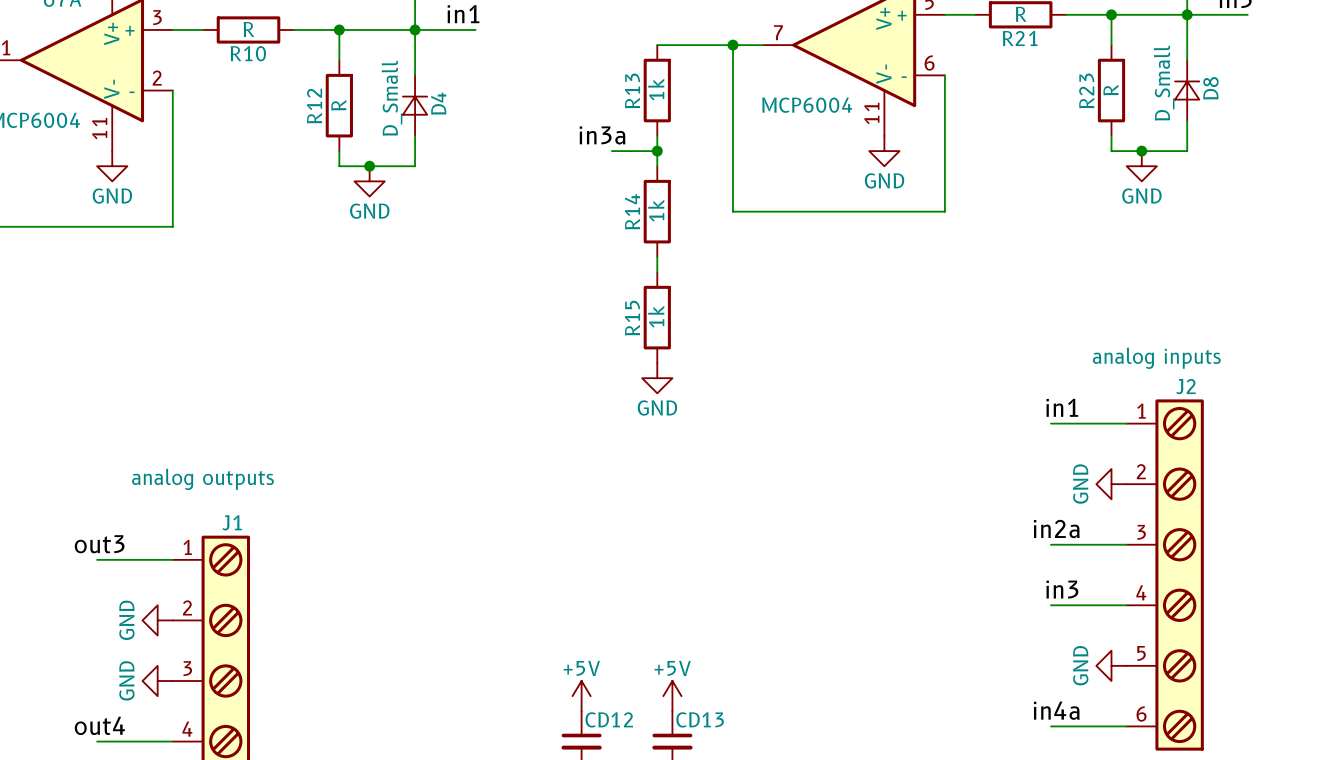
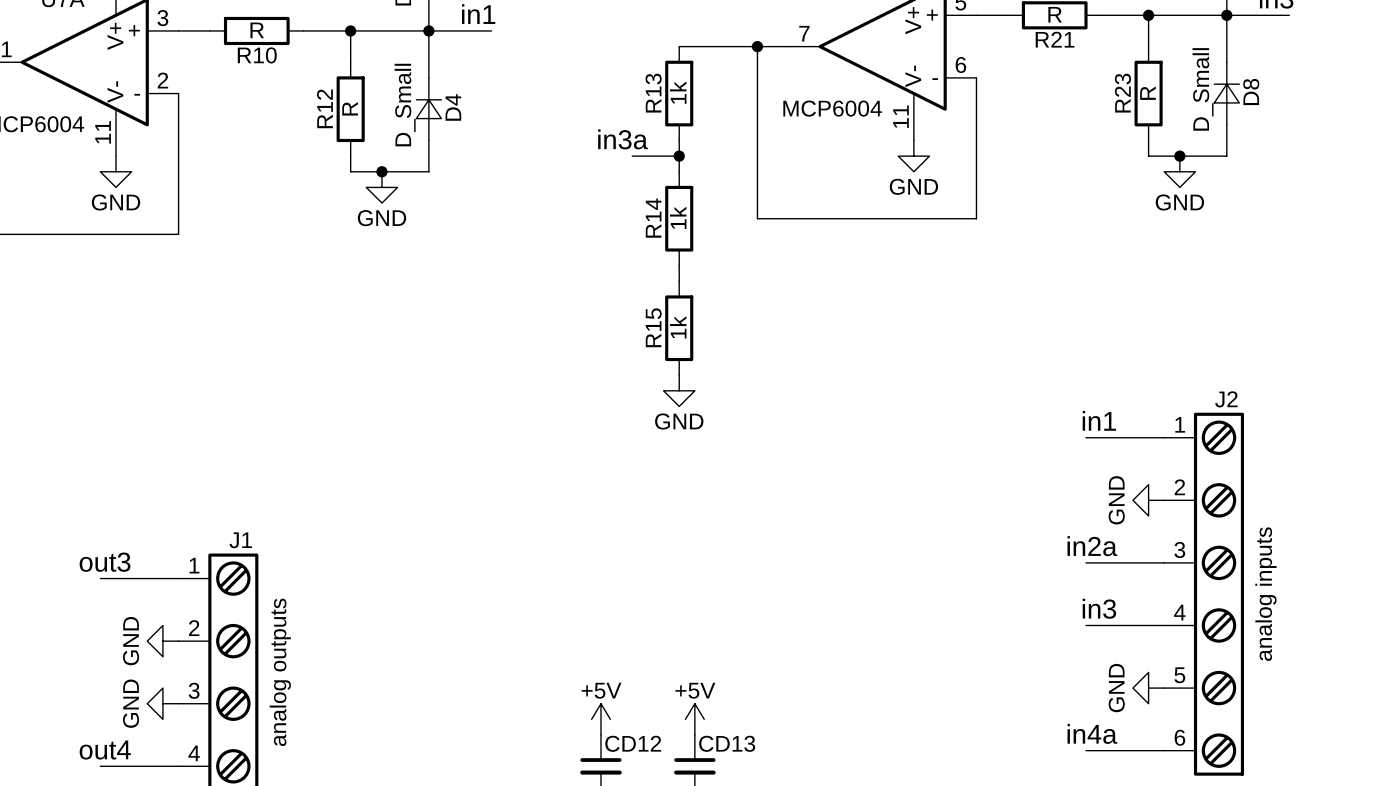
J2 value rotation: 0° (1156, 358) -> 90° counterclockwise (1265, 594)
J2 value position: analog inputs (1156, 358) -> analog inputs (1265, 594)
J1 value rotation: 0° (202, 479) -> 90° counterclockwise (280, 672)

